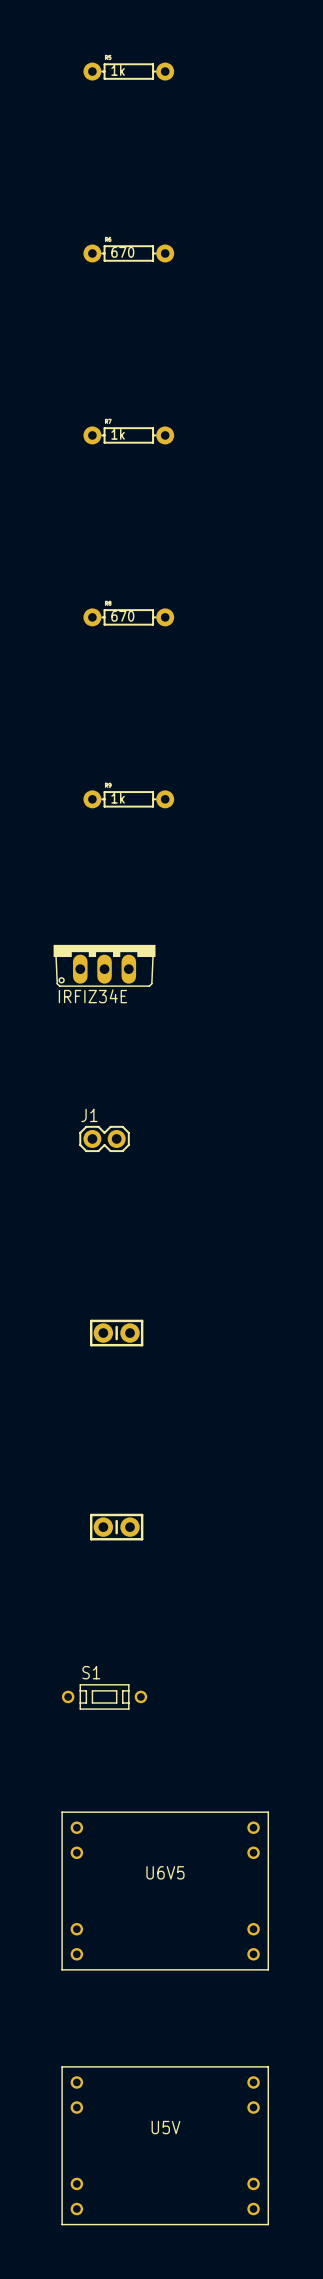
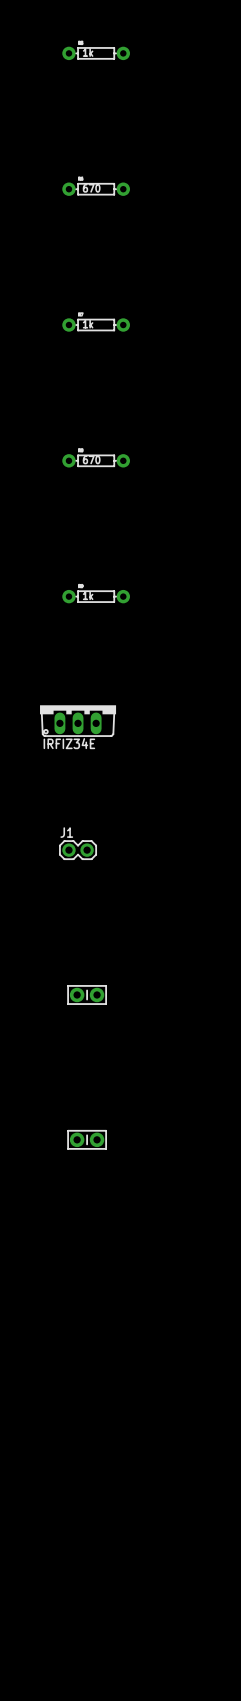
S1: (104, 1696) -> none
U6V5: (165, 1891) -> none
U5V: (165, 2145) -> none

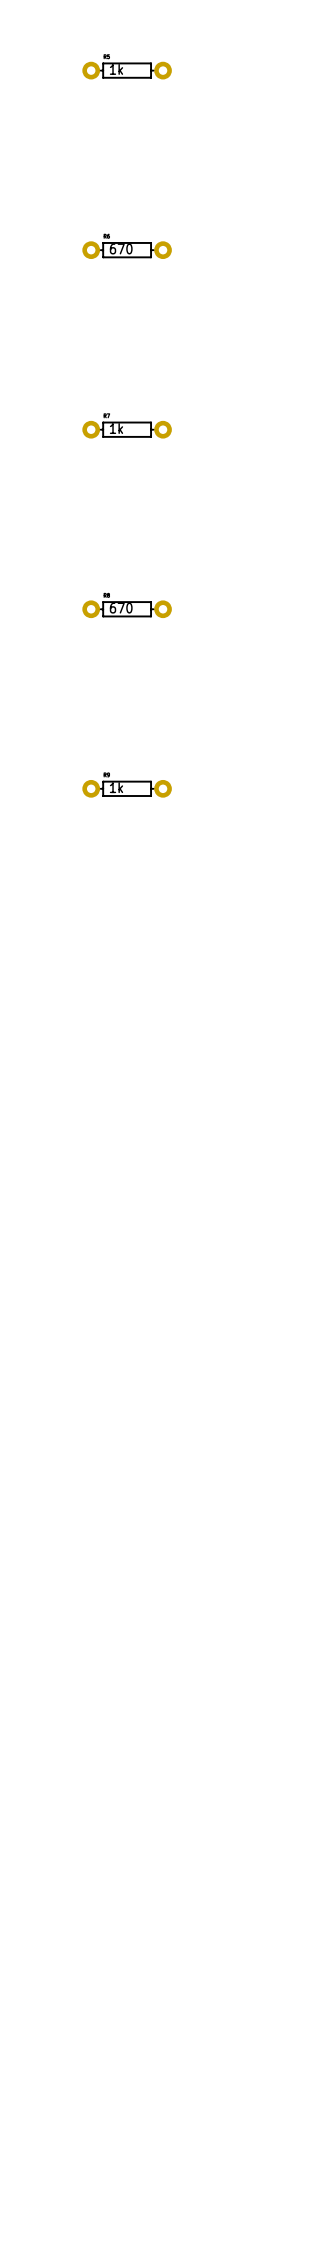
IRFIZ34E: (78, 720) -> none
J1: (78, 850) -> none
part: (87, 994) -> none
part: (87, 1139) -> none

